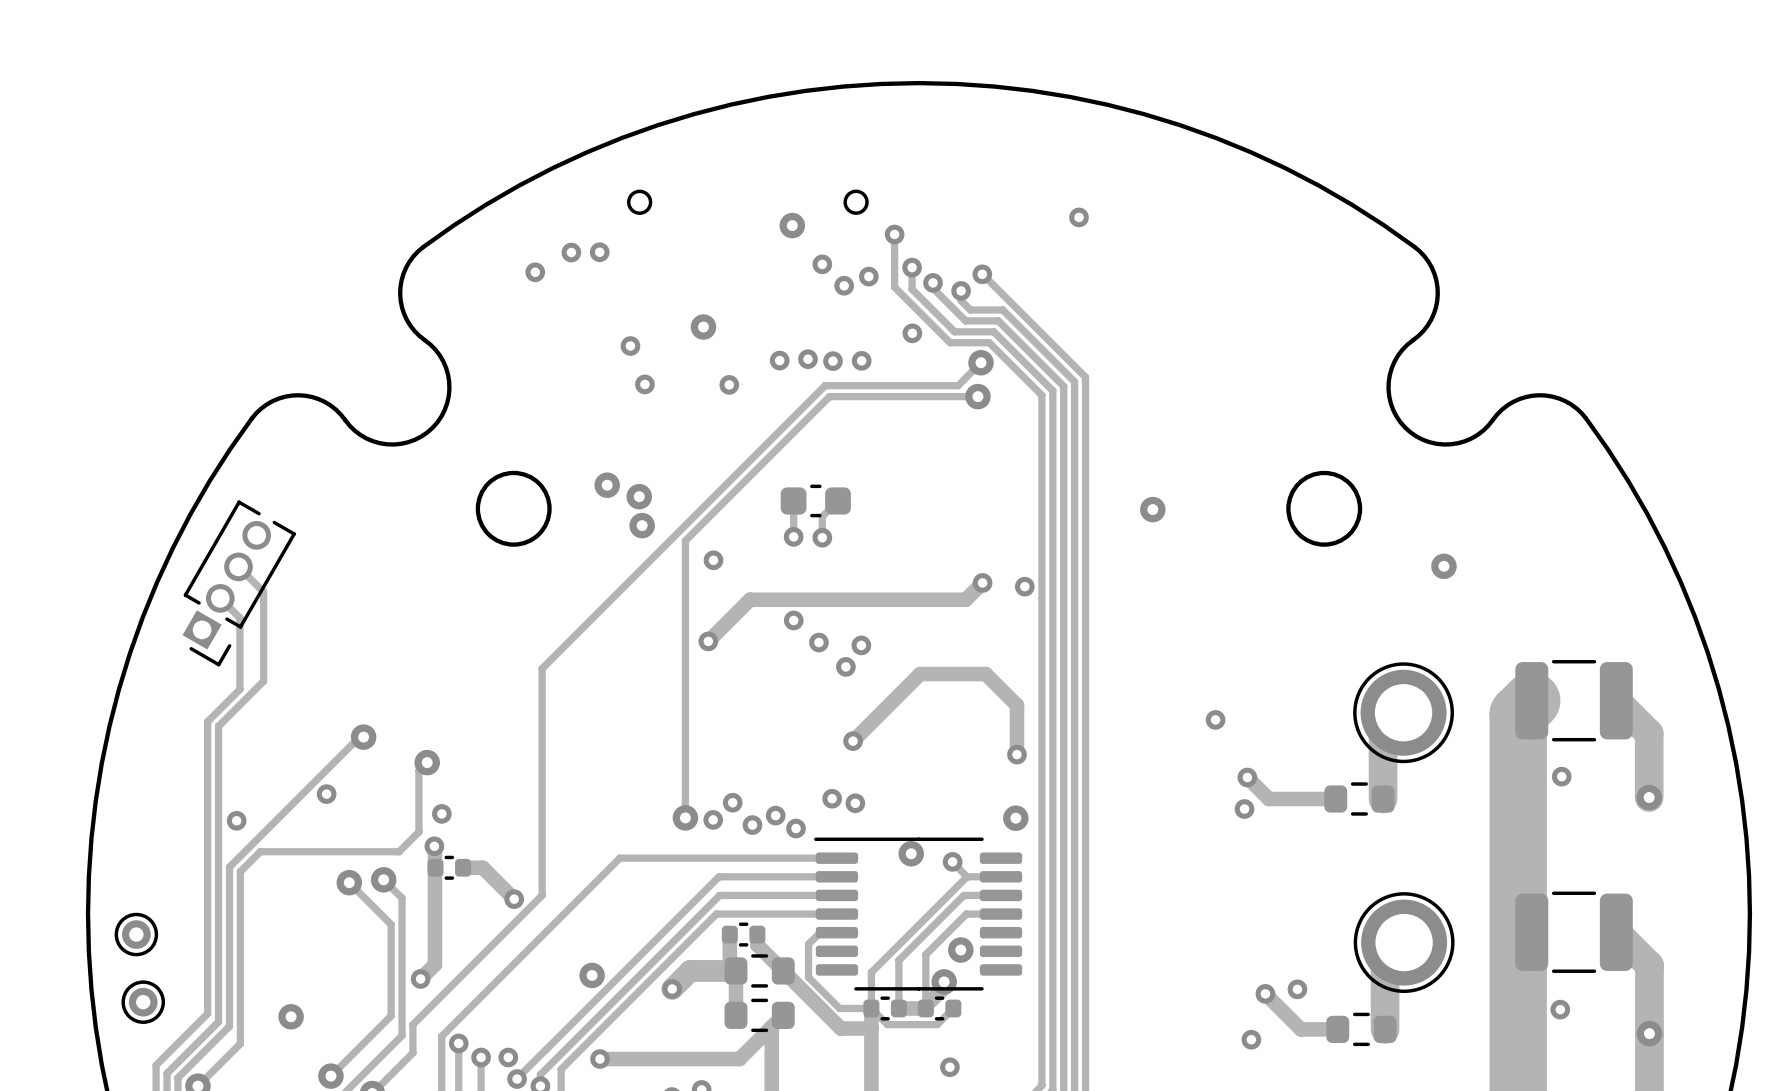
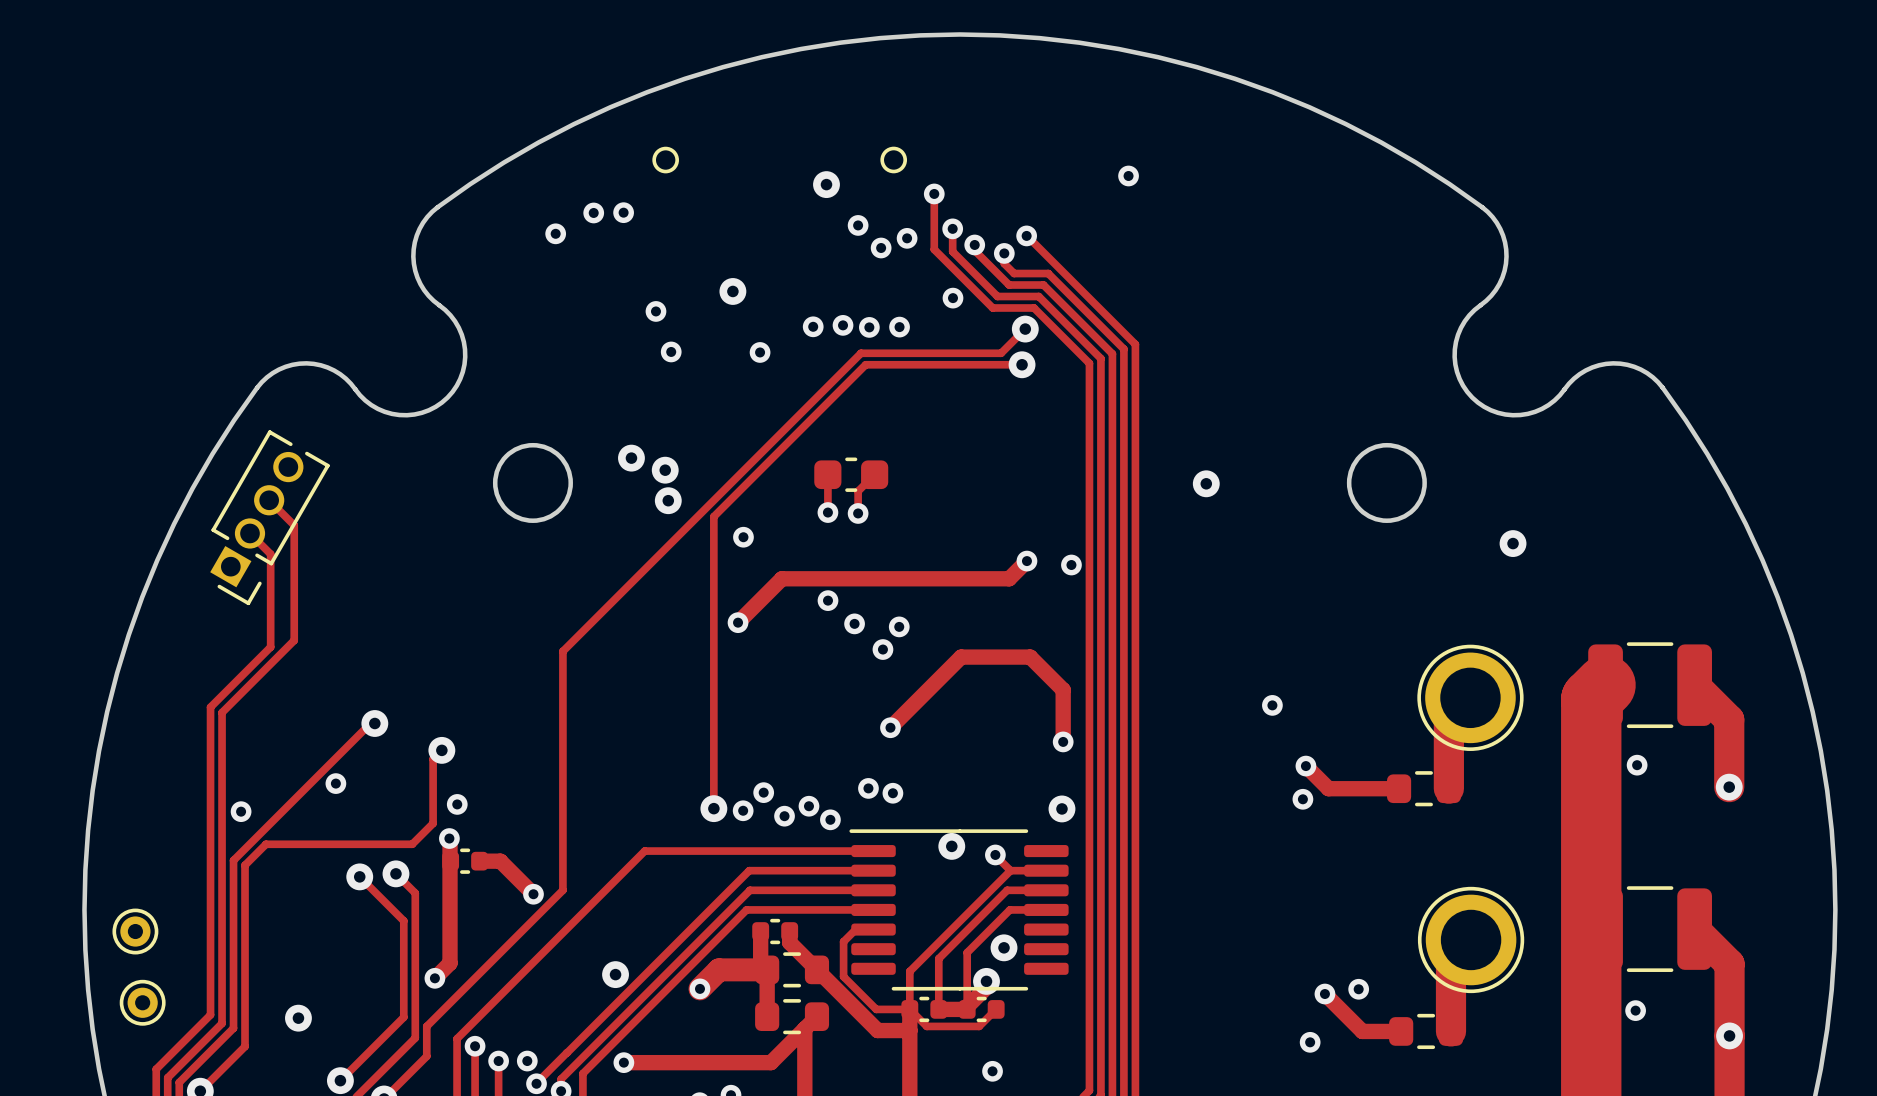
track: (238, 566) (263, 591) (263, 681) (218, 726) -> (269, 500) (294, 525) (294, 640) (222, 712)
part position: (239, 583) -> (269, 517)
track: (220, 598) (239, 618) (239, 689) -> (249, 533) (270, 554) (270, 647) (244, 673)

